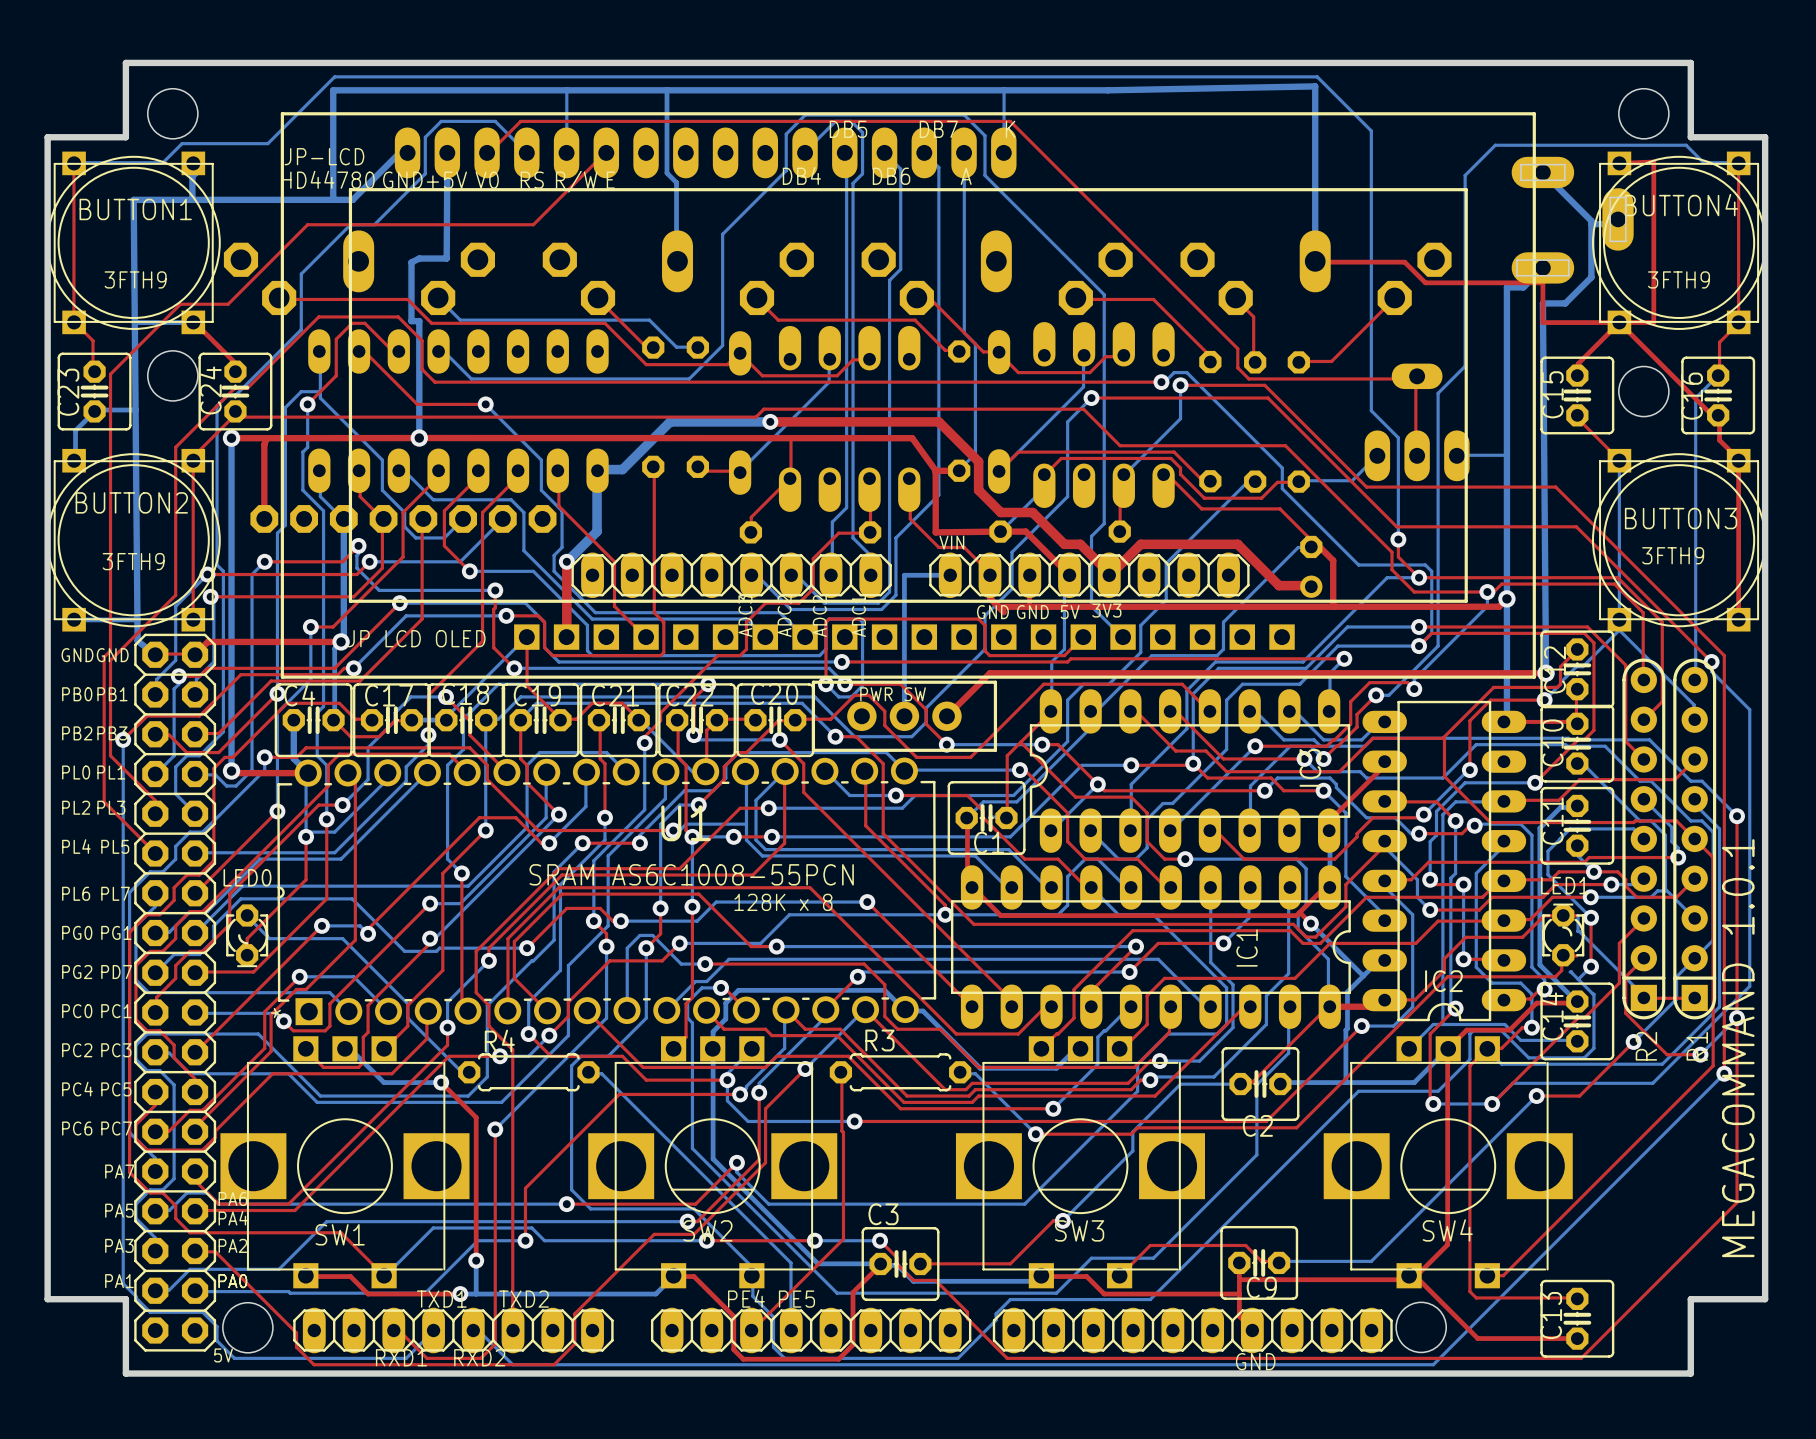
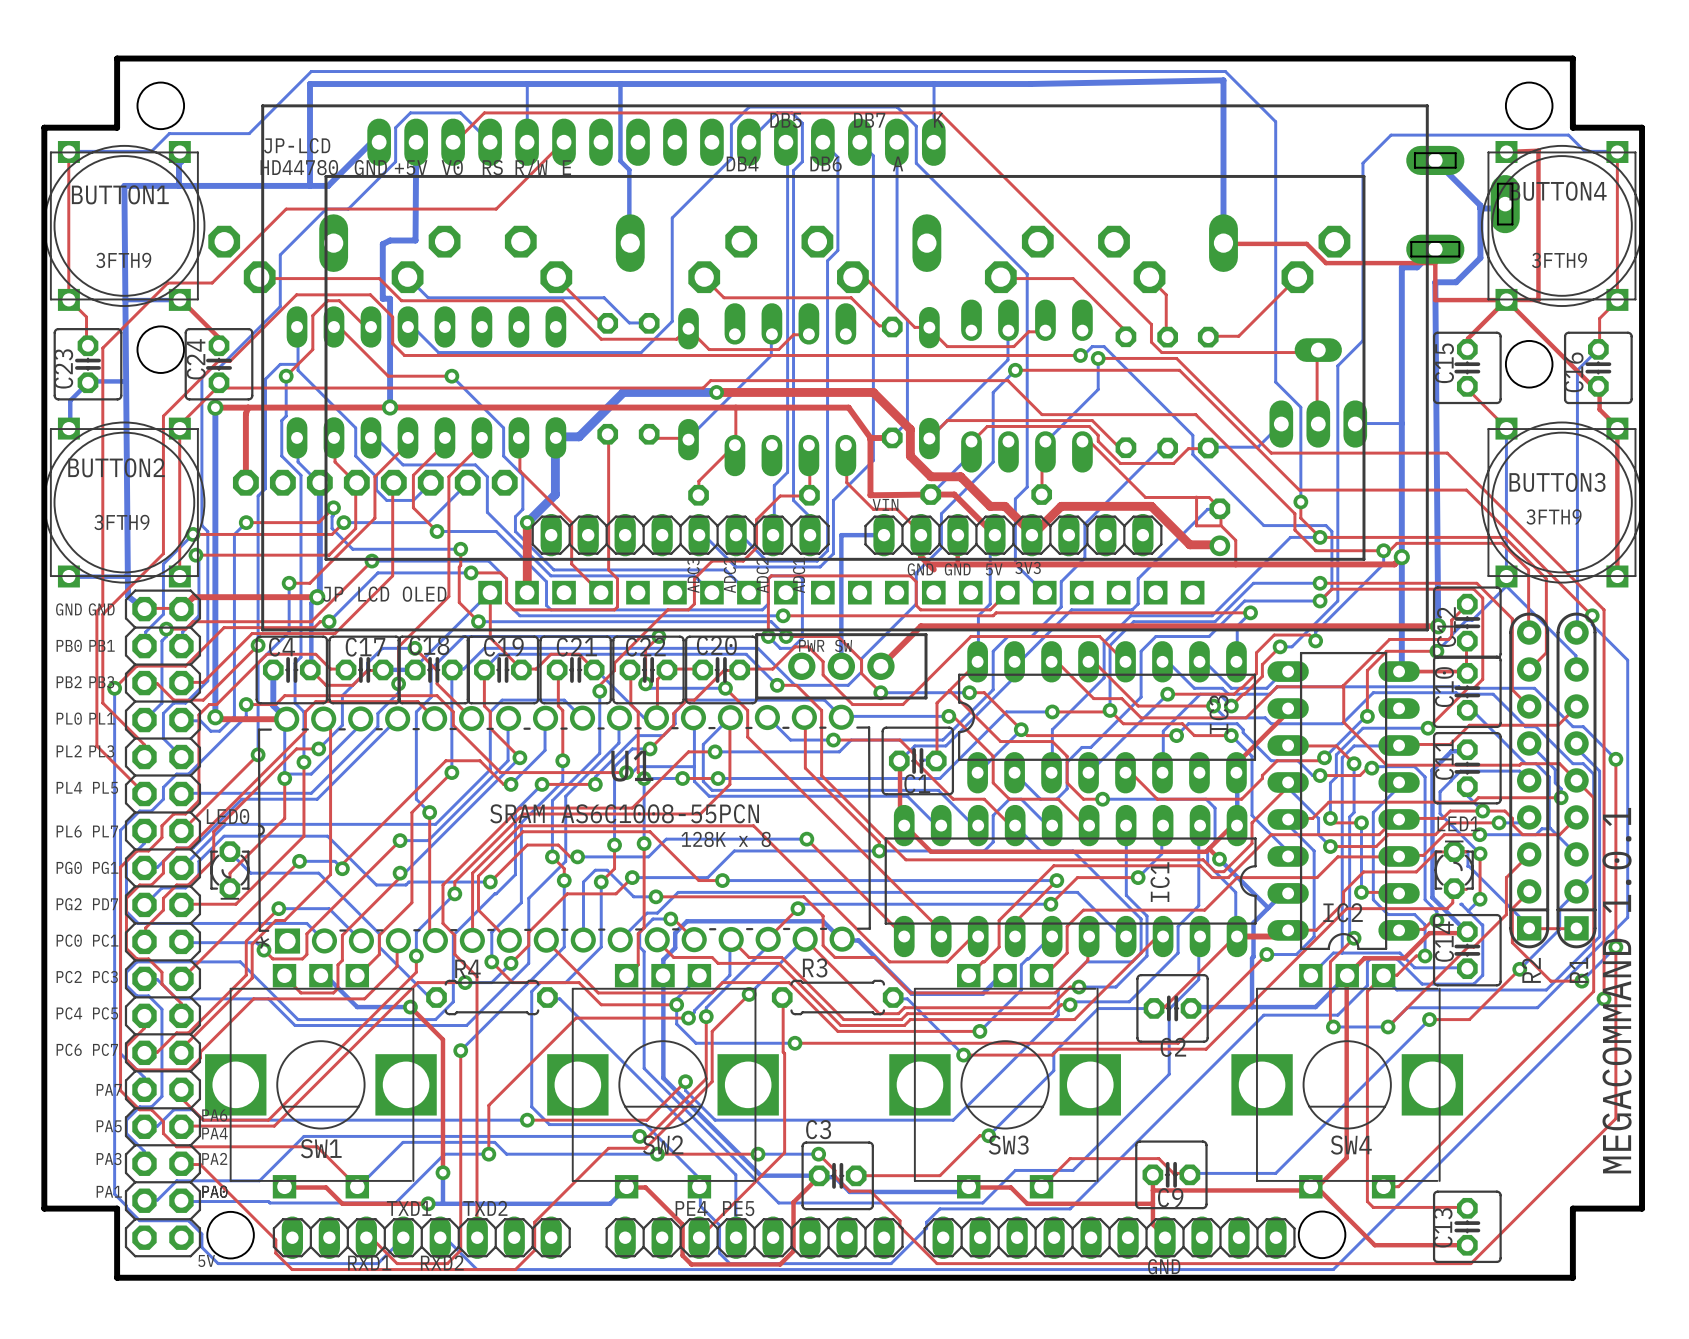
top track: (1163, 474) (1170, 477) (1201, 508) (1280, 508) (1311, 540) (1311, 546) (1319, 546) (1333, 560) (1333, 606) -> (1082, 441) (1090, 442) (1145, 497) (1209, 497) (1219, 508)
top track: none -> (1196, 497) (1196, 525) (1219, 525)
top track: none -> (1220, 509) (1220, 525) (1235, 540) (1235, 564)

